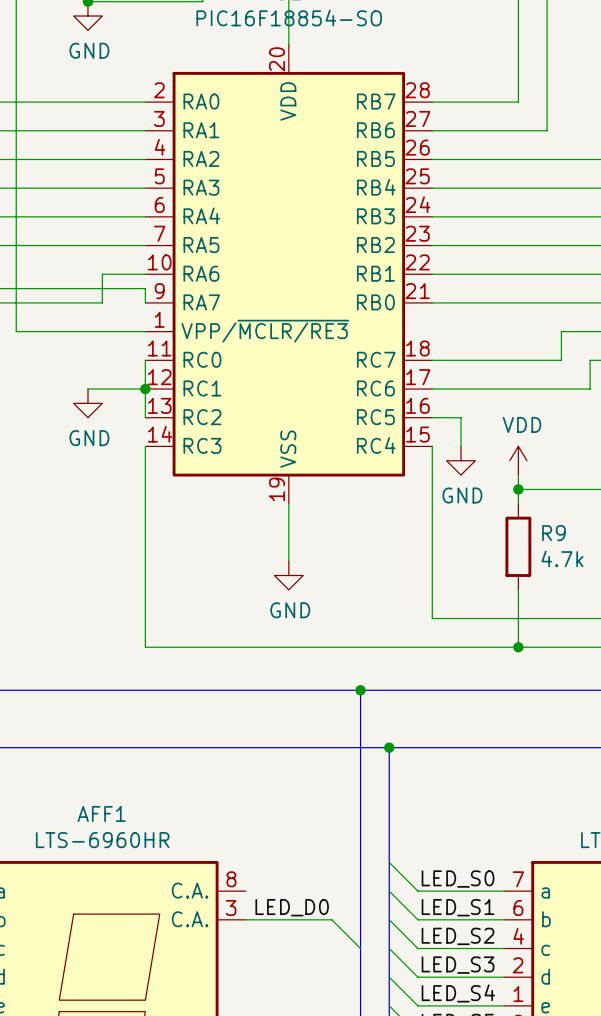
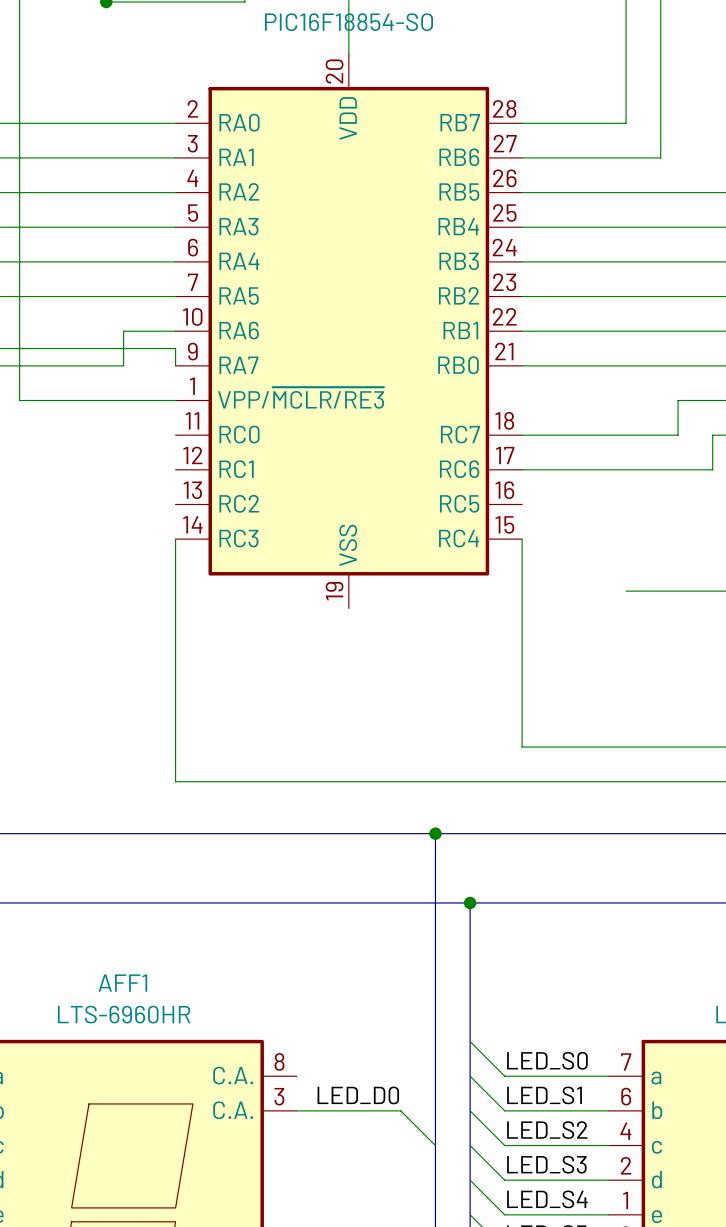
power symbol: GND (87, 16) -> none
wire: (145, 360) (145, 417) -> none
wire: (87, 389) (145, 389) -> none
junction: (145, 389) -> none
power symbol: GND (87, 403) -> none
wire: (432, 417) (460, 417) (460, 446) -> none
power symbol: GND (460, 460) -> none
power symbol: VDD (518, 460) -> none
wire: (518, 475) (518, 503) -> none
junction: (518, 489) -> none
wire: (288, 503) (288, 561) -> none
R9: 4.7k (518, 546) -> none
power symbol: GND (288, 575) -> none
wire: (518, 589) (518, 647) -> none
junction: (518, 647) -> none

